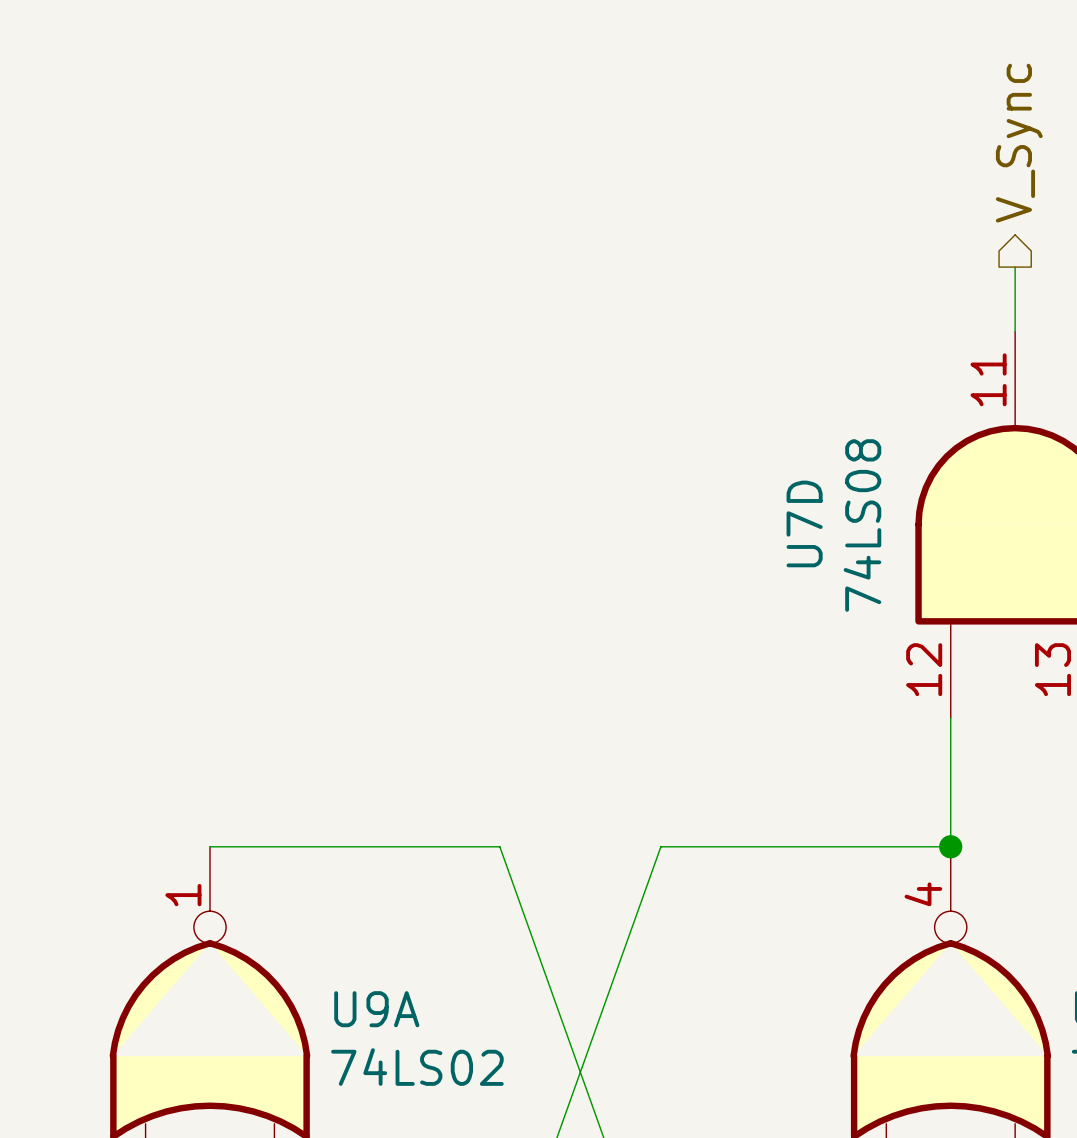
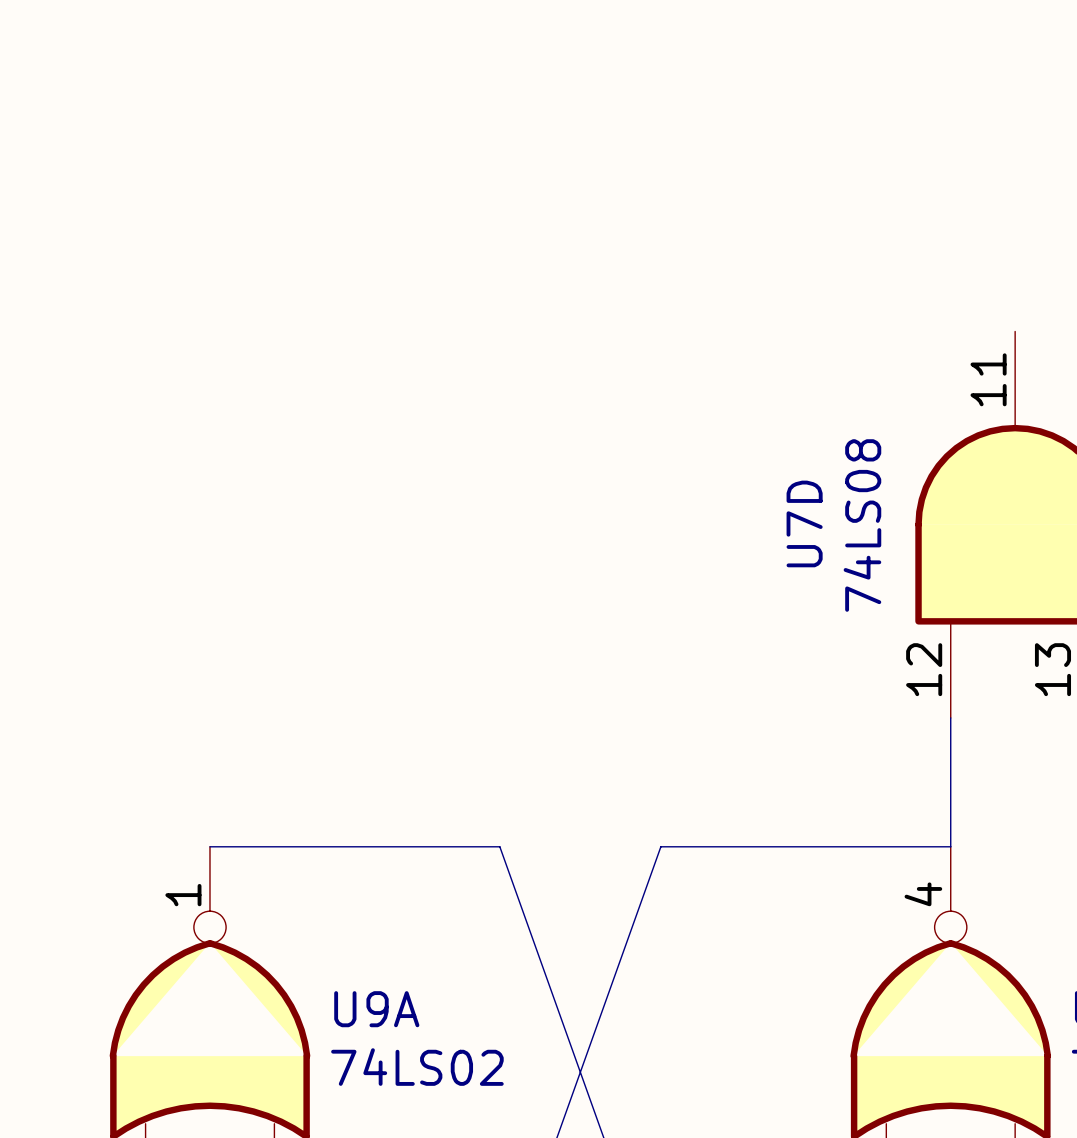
hierarchical label: V_Sync (1019, 143) -> none
wire: (1015, 267) (1015, 331) -> none
junction: (950, 846) -> none

